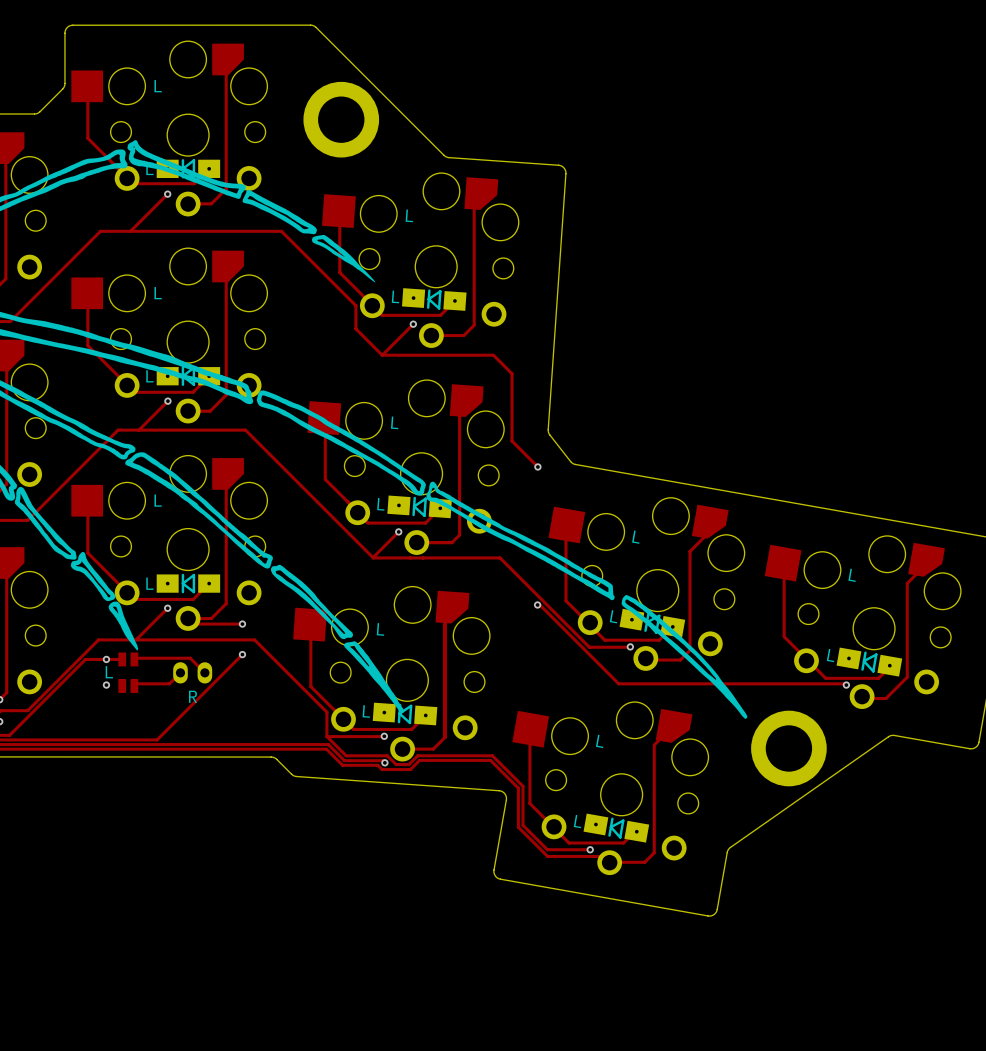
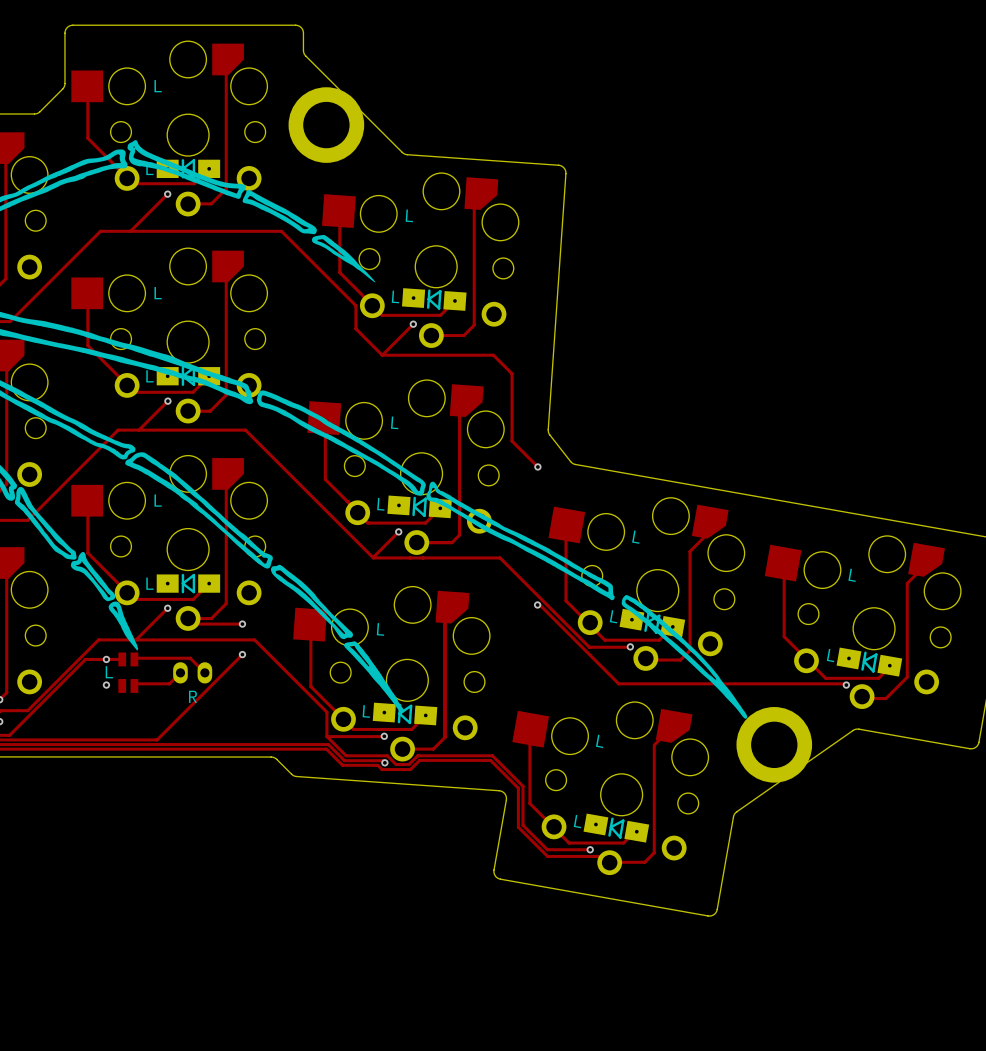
board edge: (72, 25) (312, 25) (443, 155) (449, 157) -> (72, 25) (298, 25) (303, 31) (305, 55) (402, 153) (449, 157)
part position: (341, 119) -> (326, 125)
part position: (788, 748) -> (774, 744)
board edge: (969, 748) (890, 735) (730, 847) (727, 852) -> (969, 748) (854, 729) (735, 812) (727, 852)

